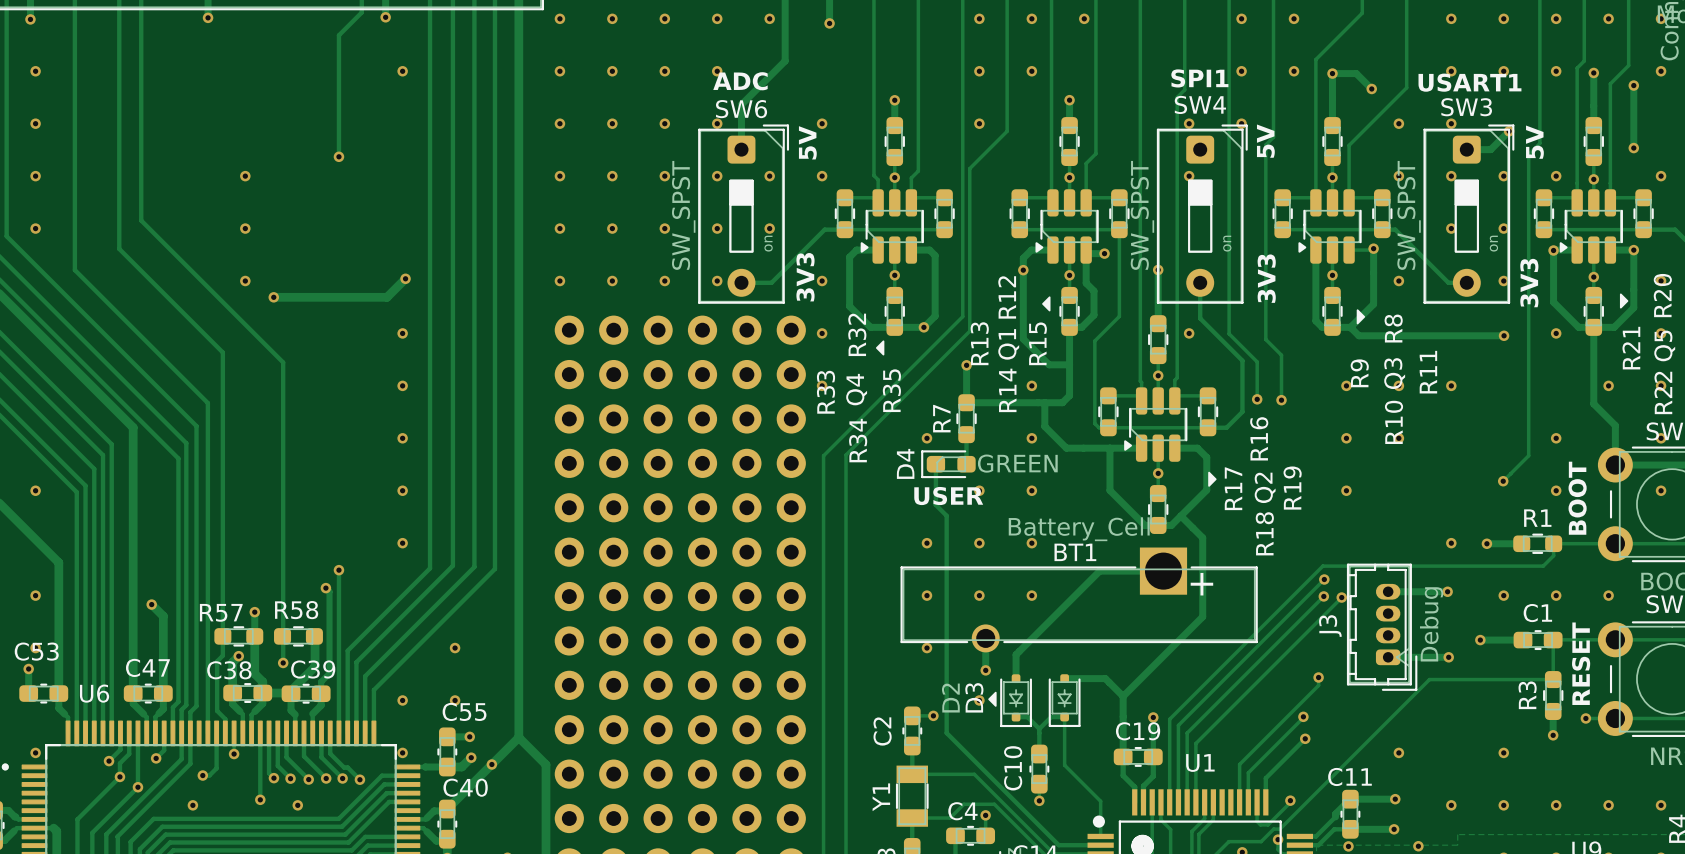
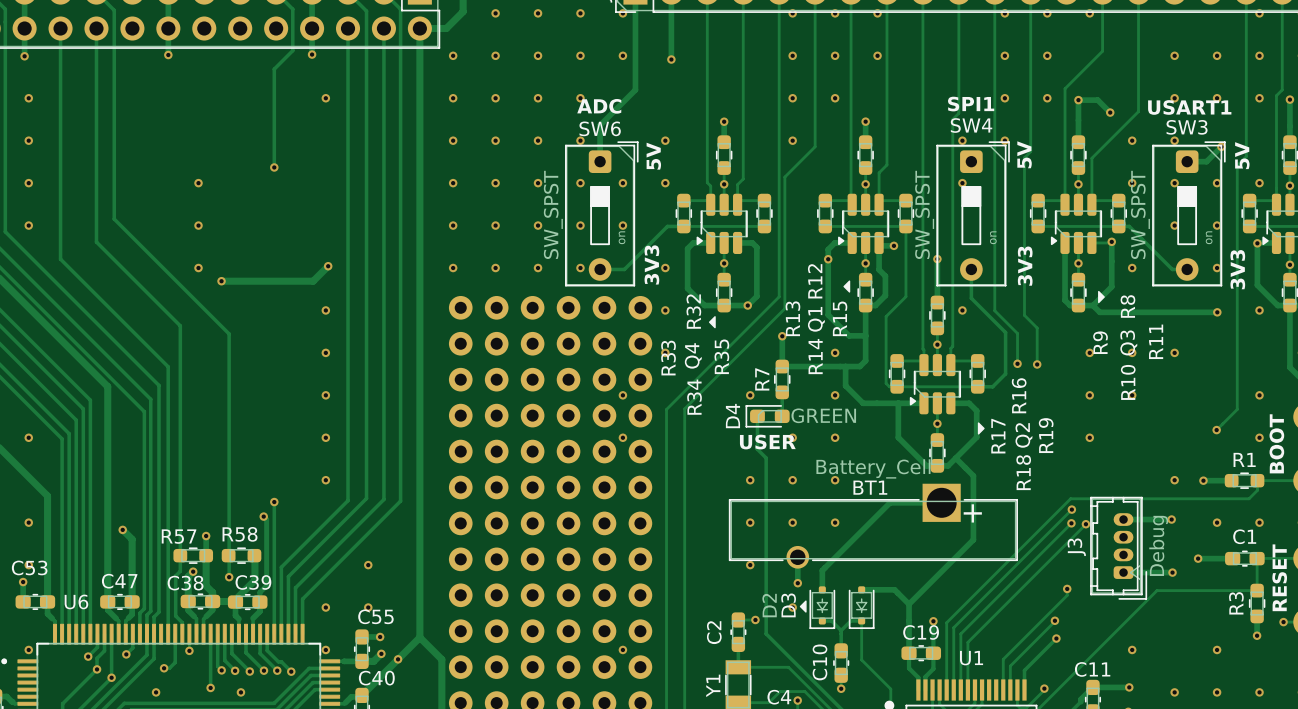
via: none -> (622, 395)
via: none -> (622, 437)
via: none -> (622, 649)

